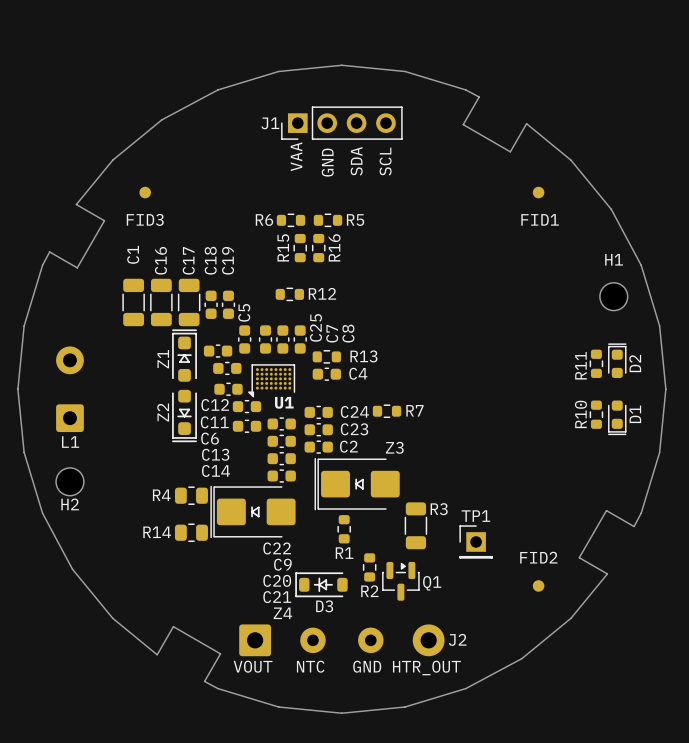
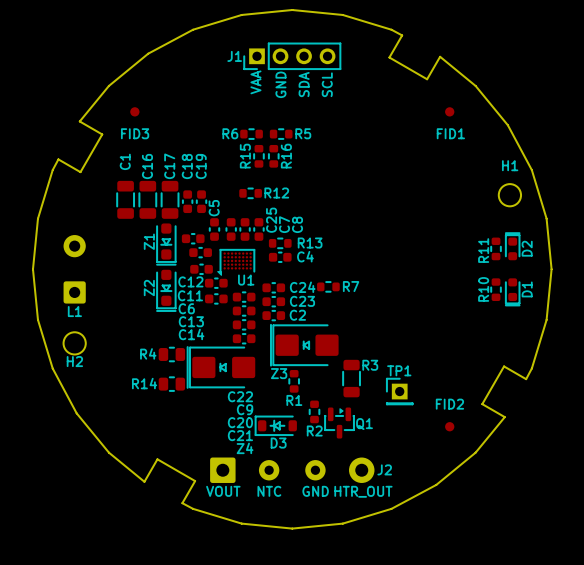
Z1 rotation: 0° (184, 355) -> 180° (166, 244)
Z3 name position: Z3 (394, 447) -> Z3 (279, 373)

